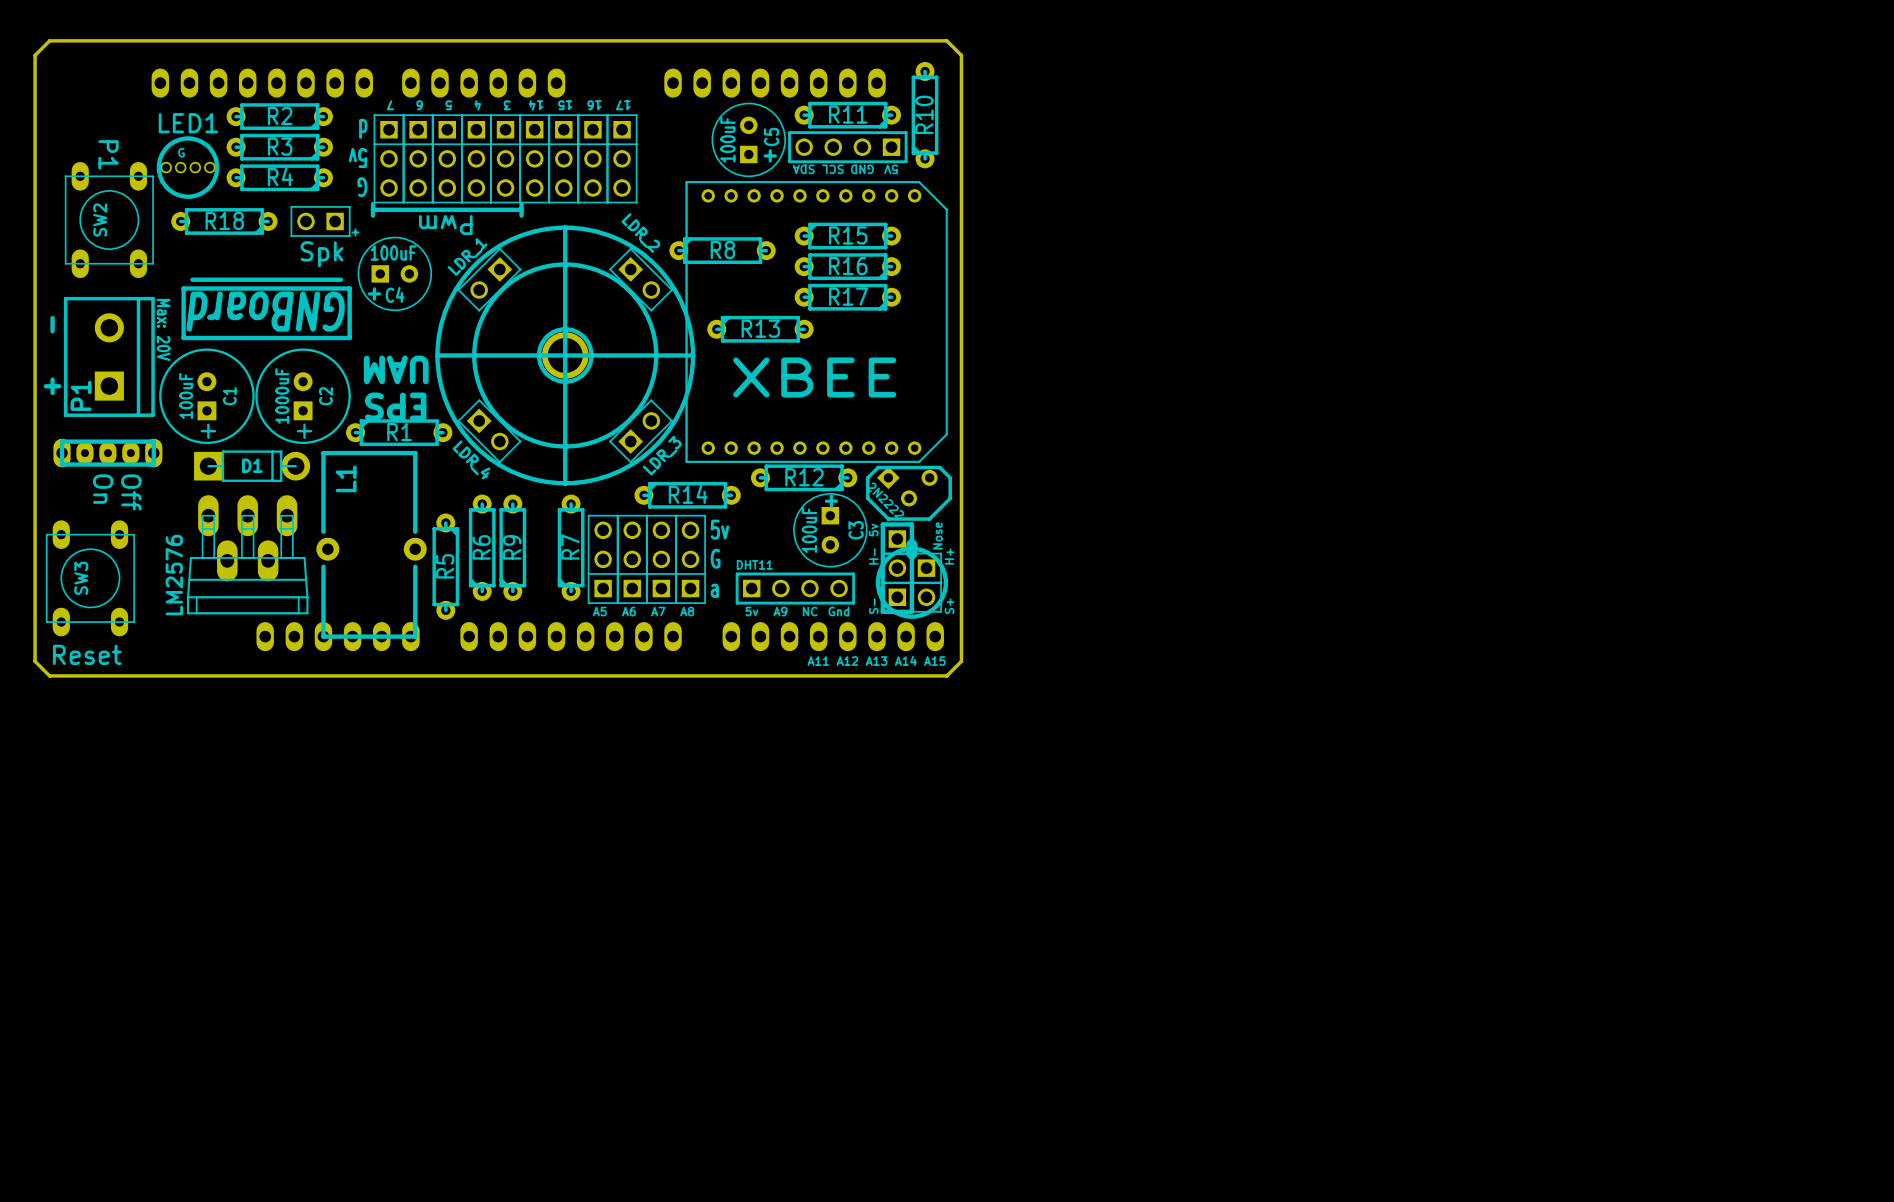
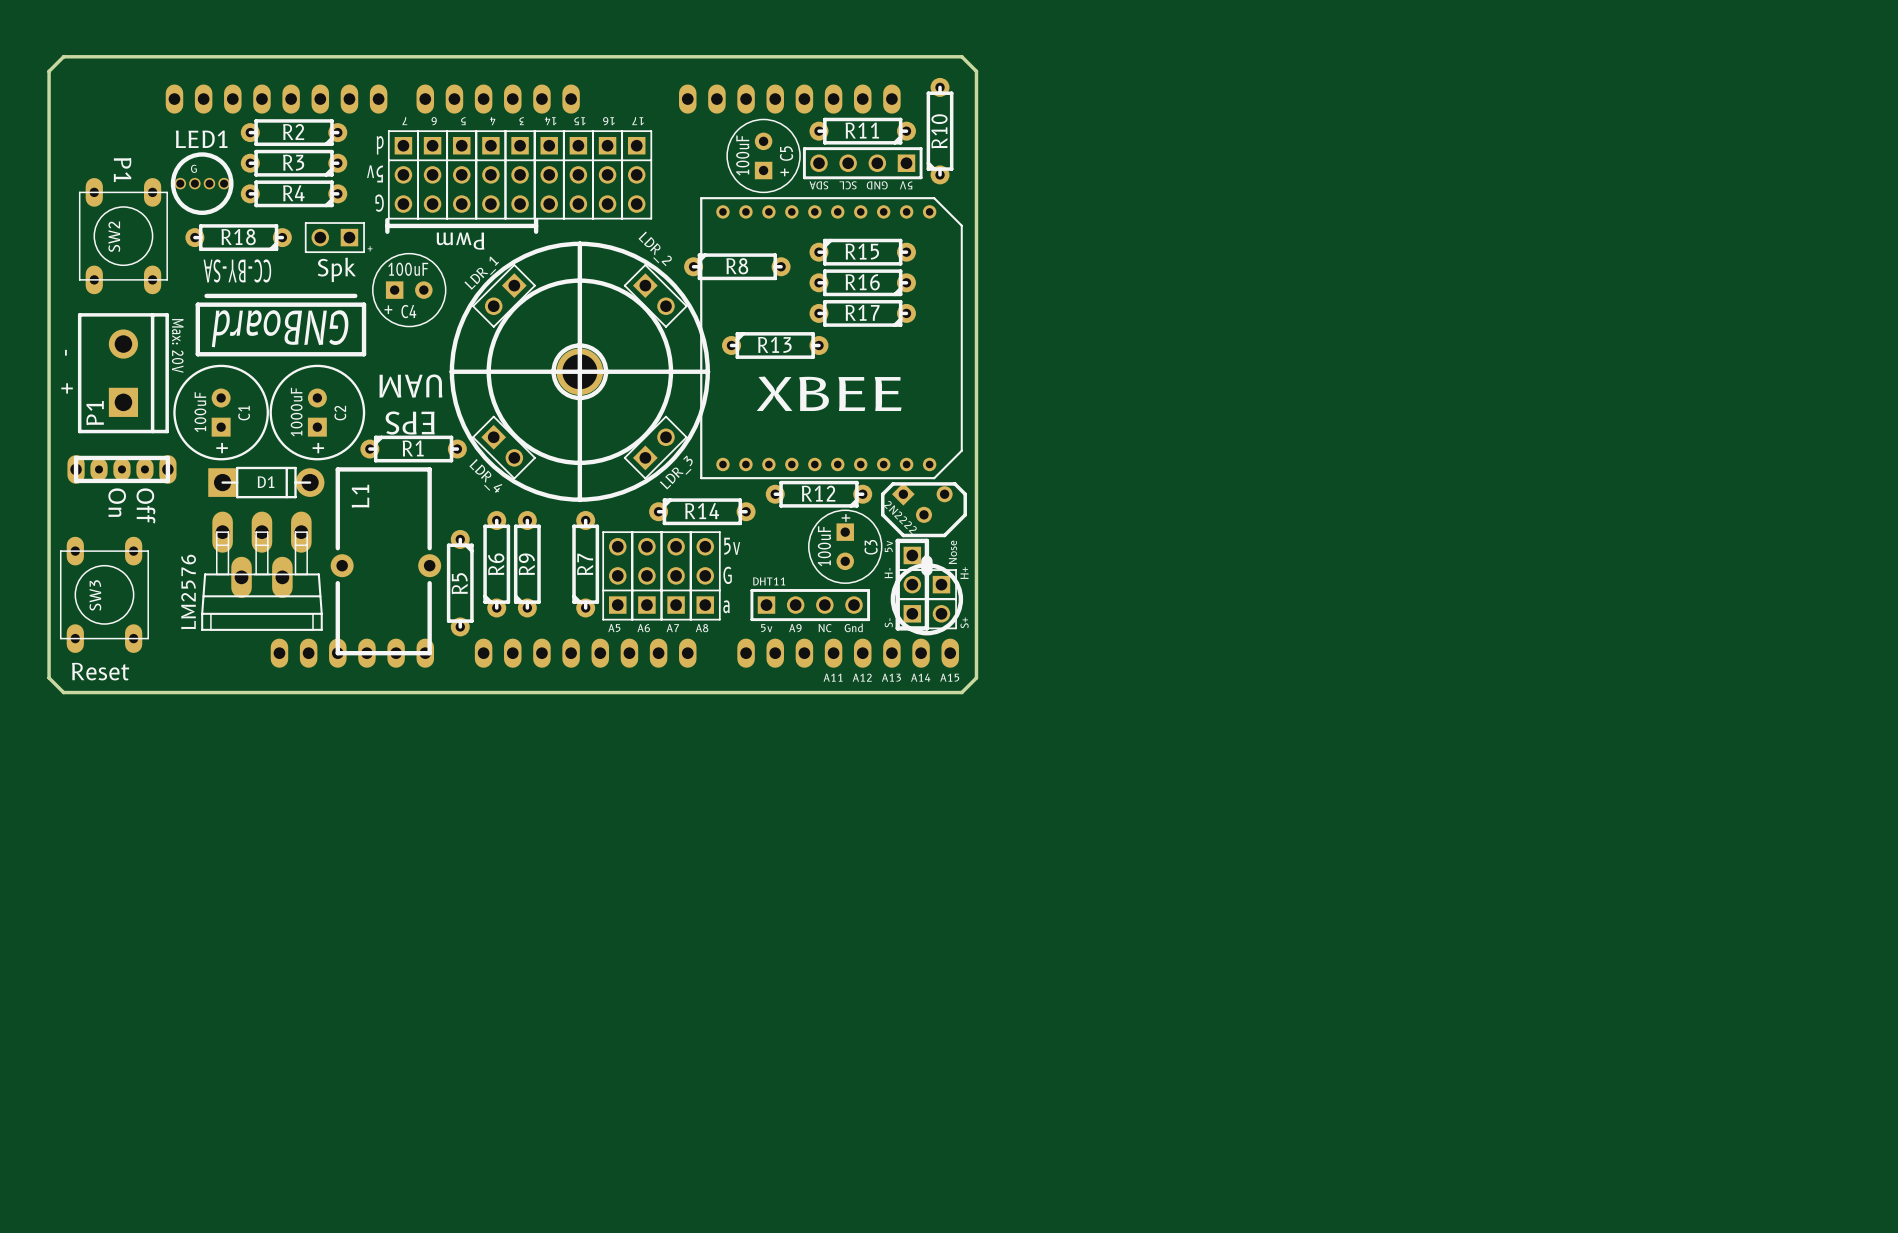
text: none -> CC-BY-SA (237, 270)

